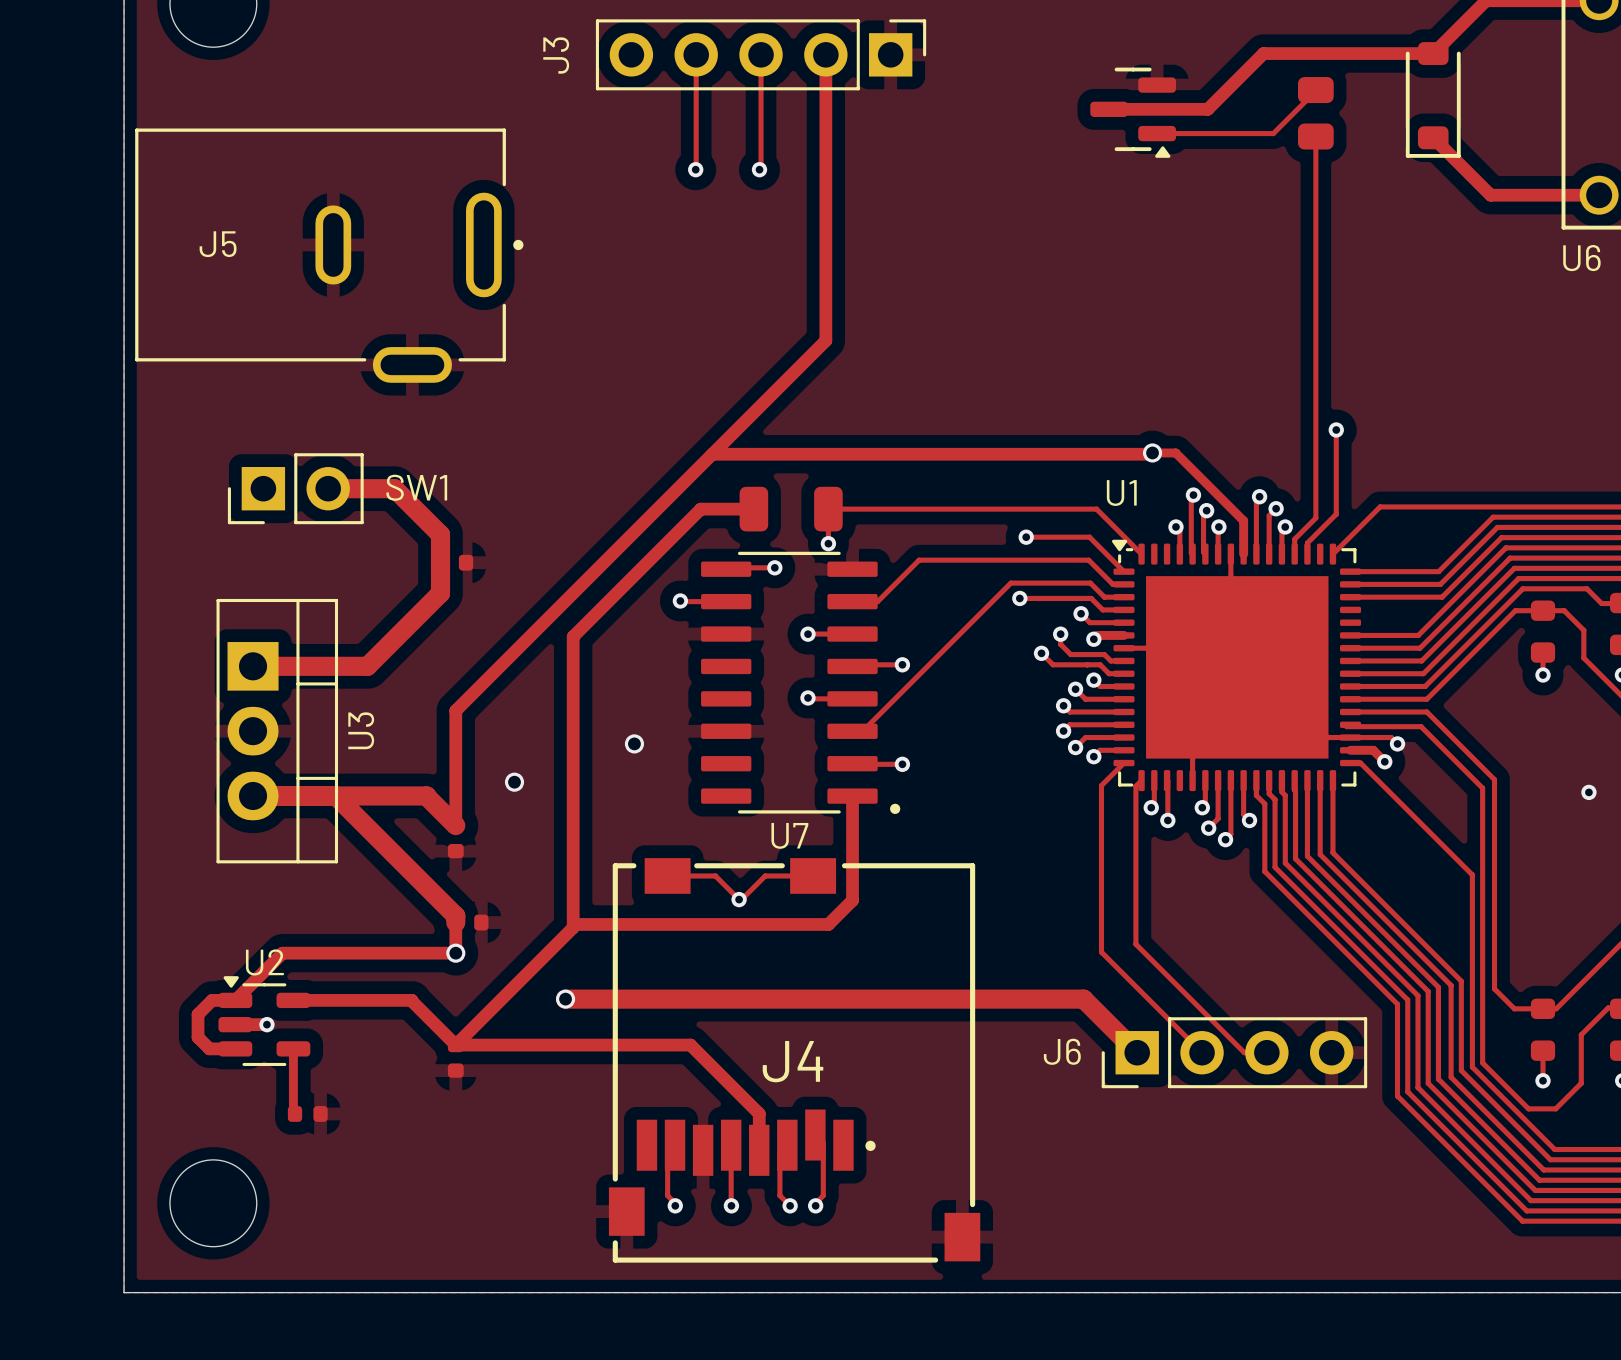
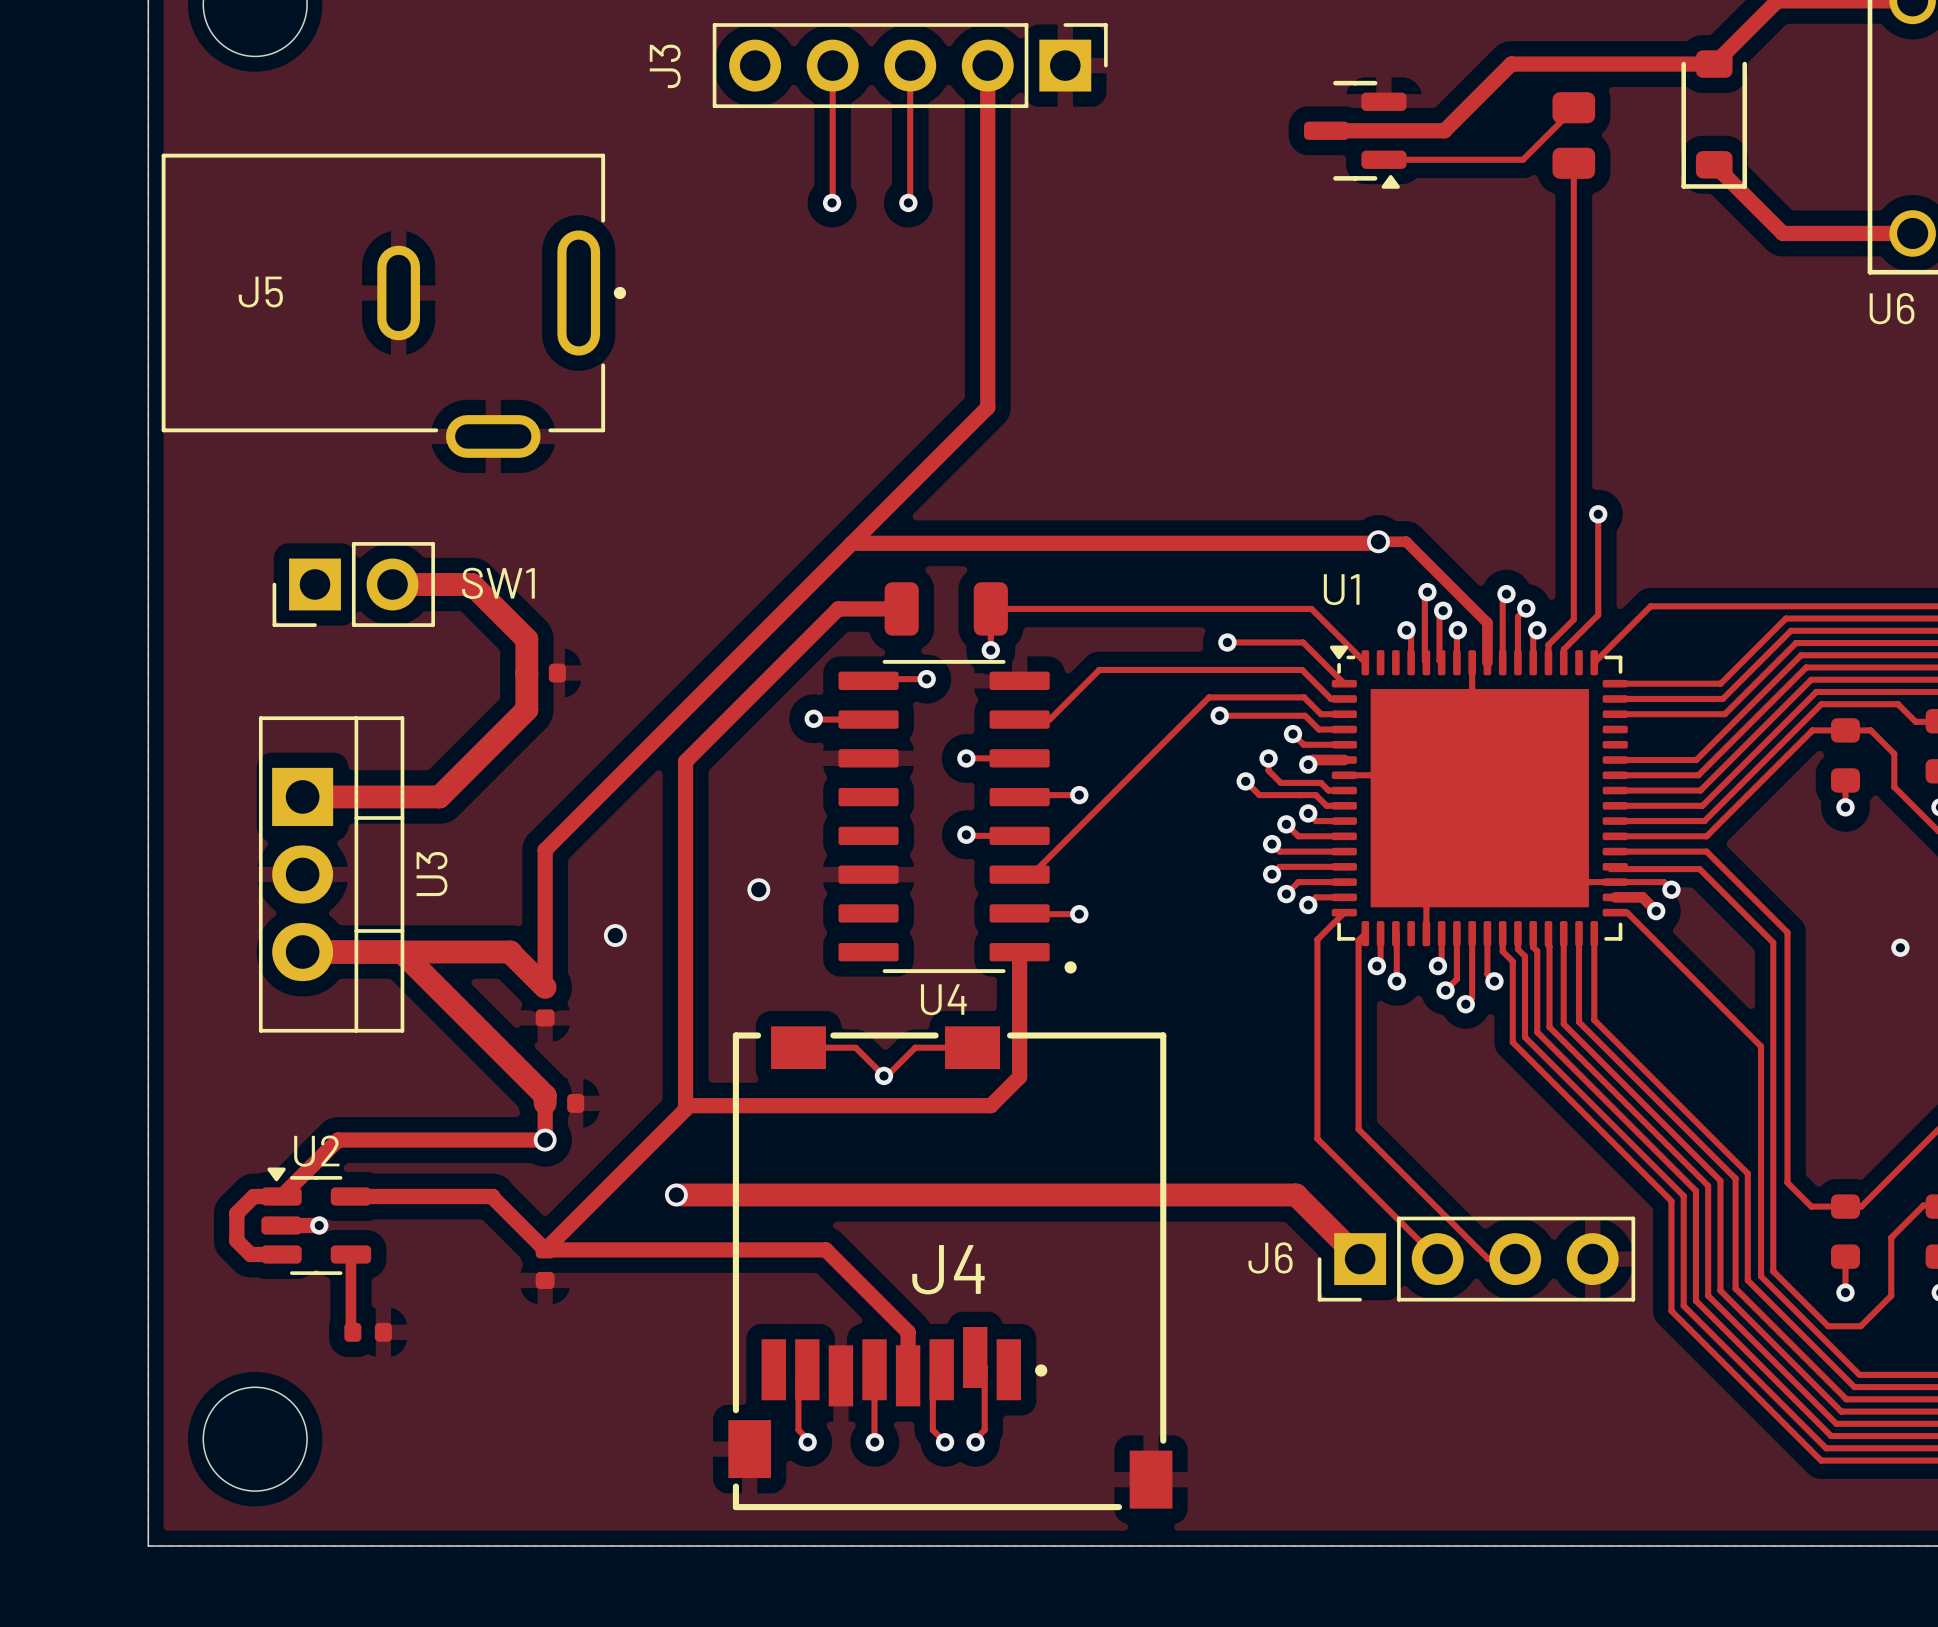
U7 name: U7 (789, 835) -> U4 (943, 999)

